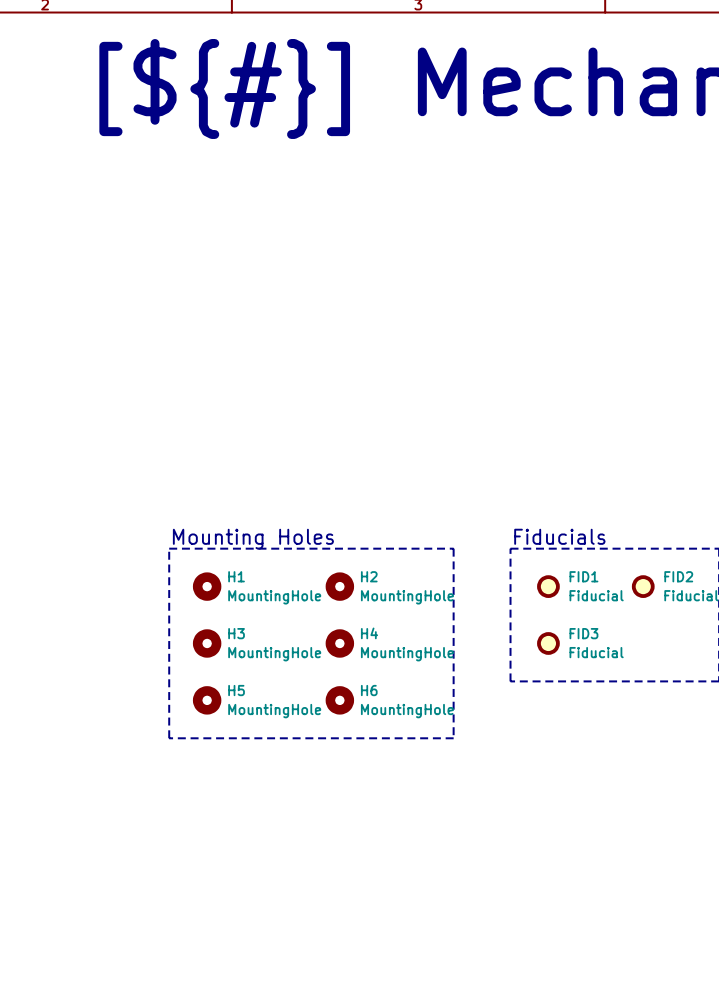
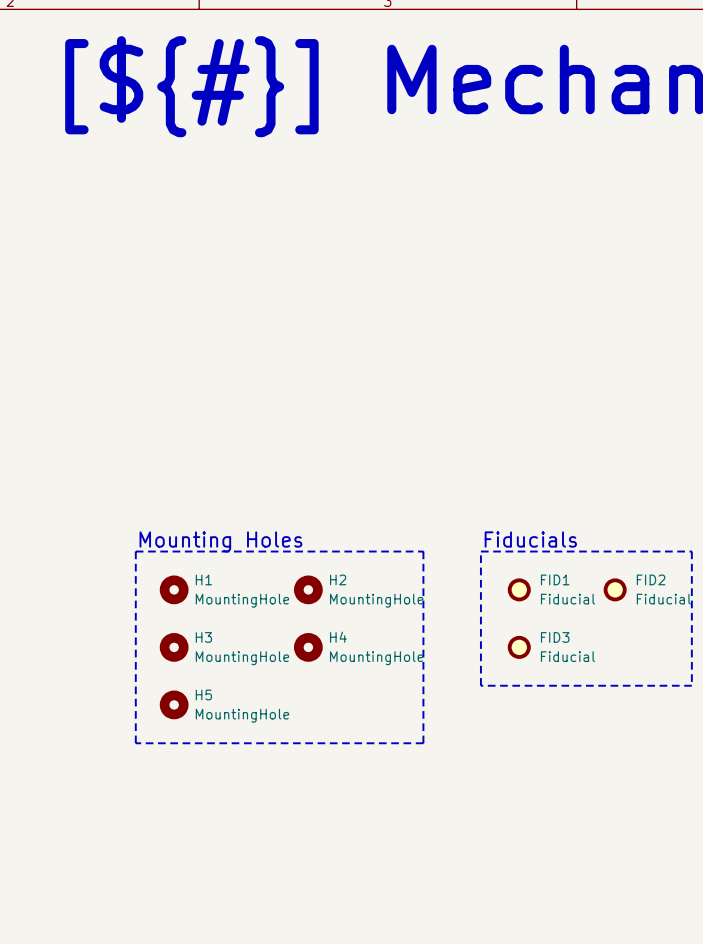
H6: MountingHole (339, 700) -> none

